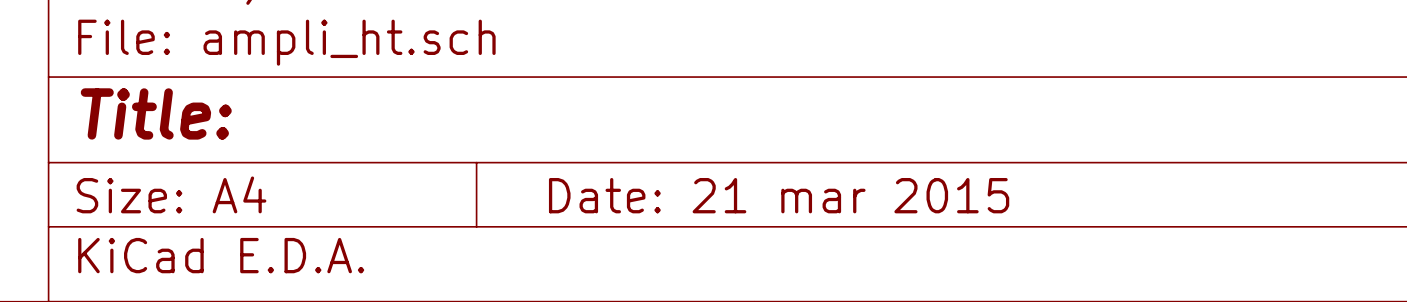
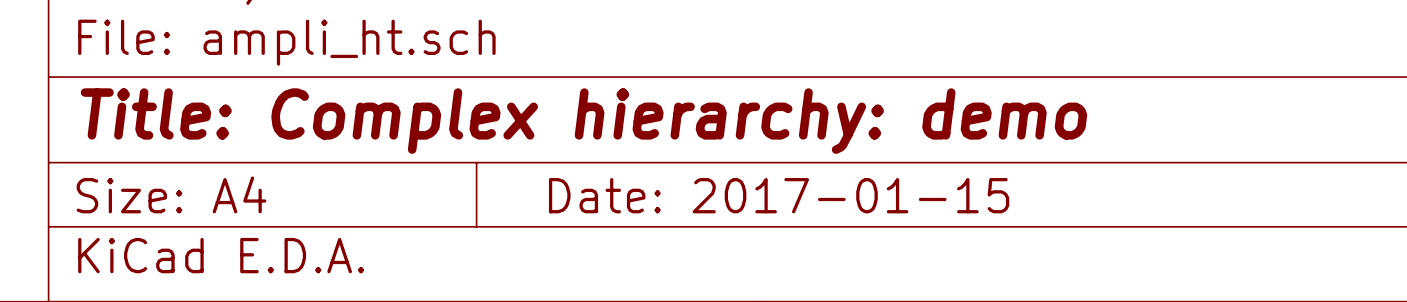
title block: Title: (156, 113) -> Title: Complex hierarchy: demo (583, 121)
title block: Date: 21 mar 2015 (779, 195) -> Date: 2017-01-15 (779, 195)

